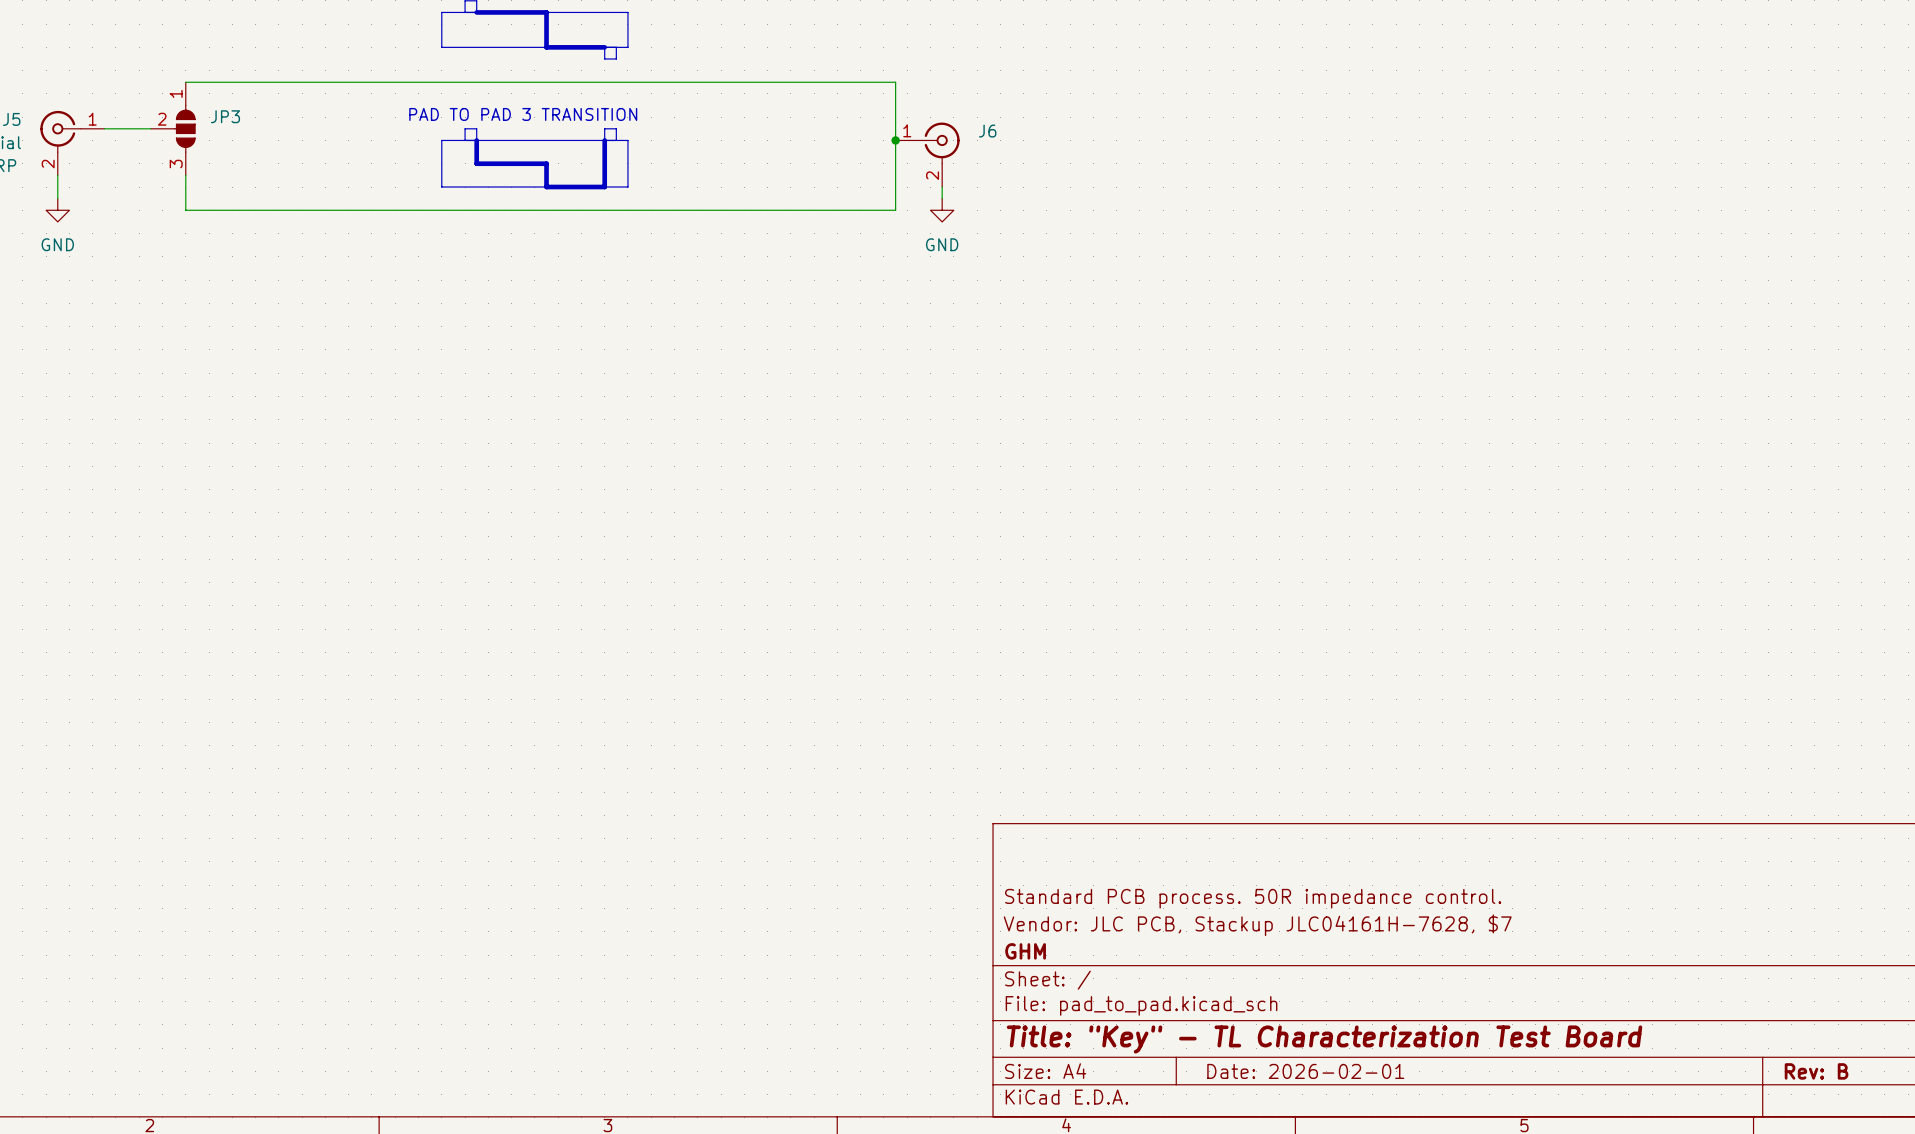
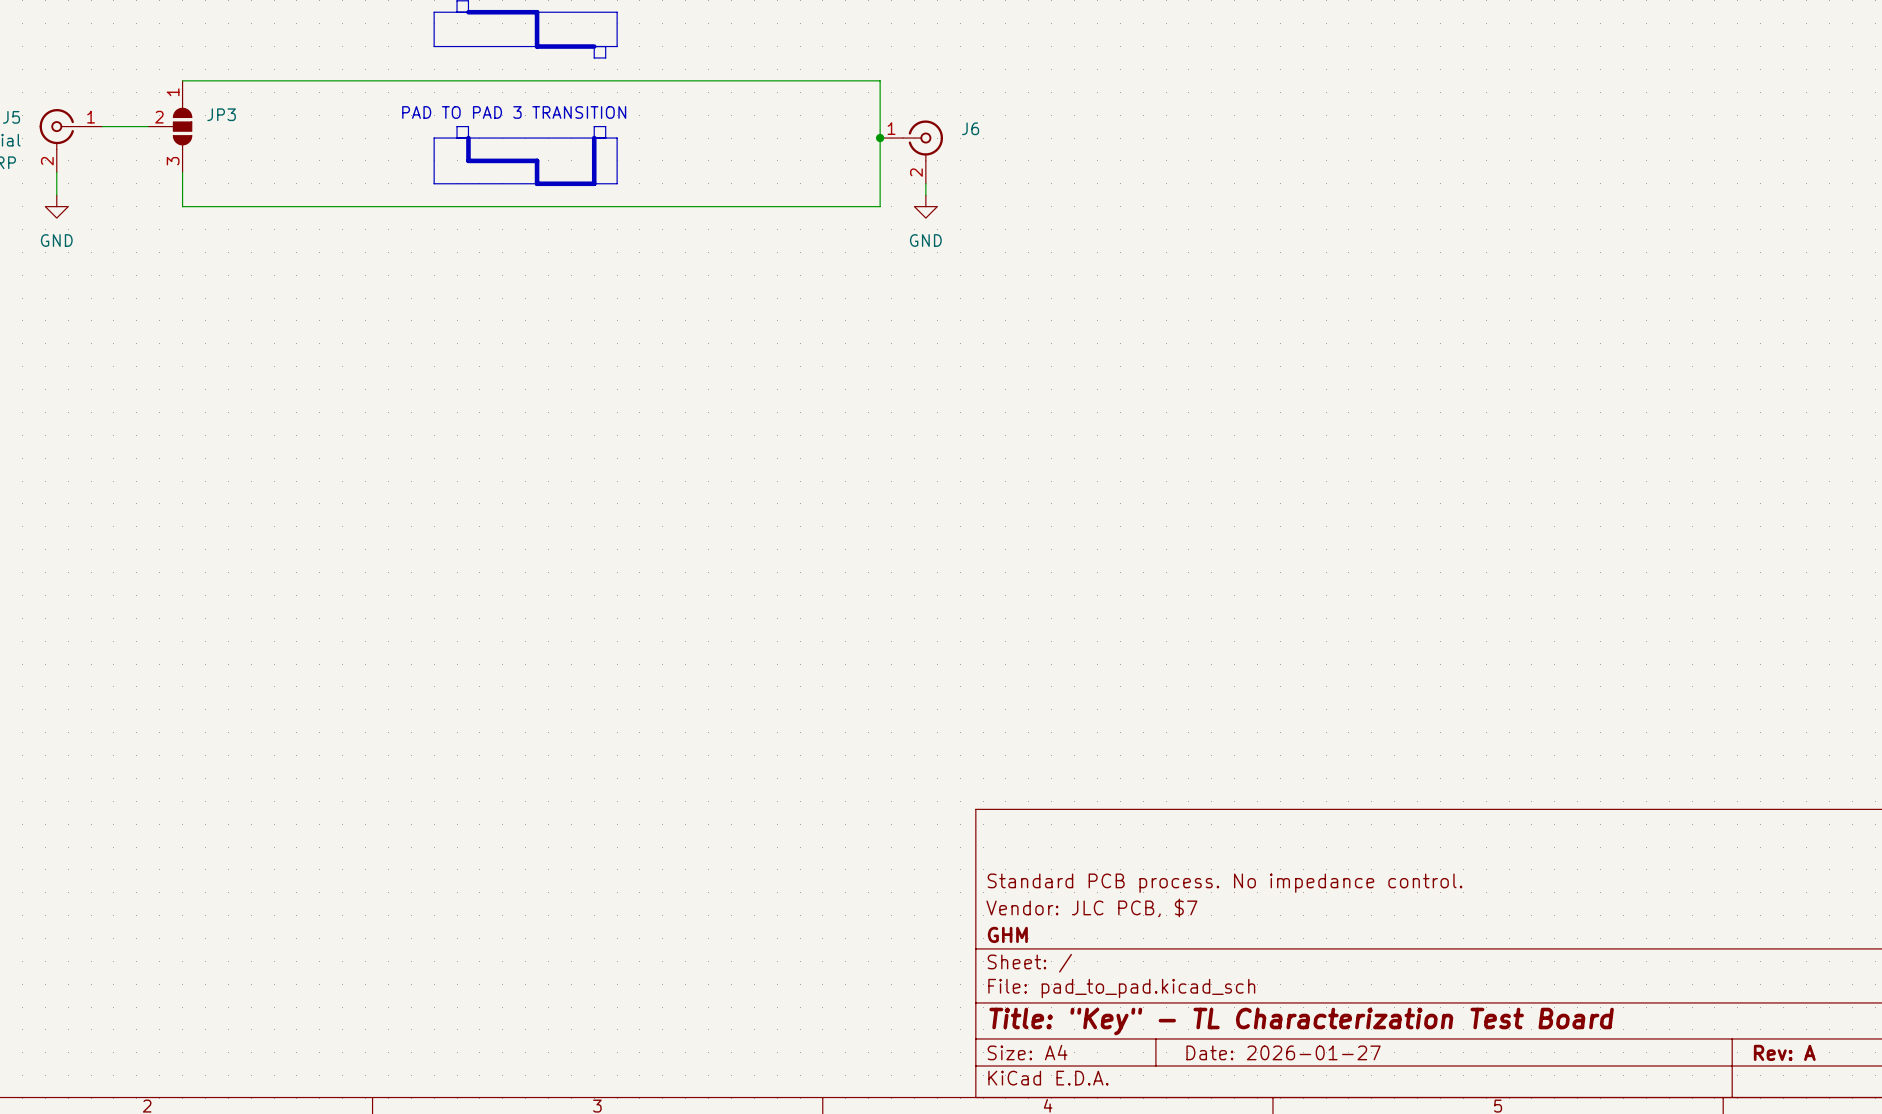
title block: Standard PCB process. 50R impedance control. (1253, 898) -> Standard PCB process. No impedance control. (1225, 883)
title block: Vendor: JLC PCB, Stackup JLC04161H-7628, $7 (1257, 925) -> Vendor: JLC PCB, $7 (1091, 907)
title block: Date: 2026-02-01 (1305, 1071) -> Date: 2026-01-27 (1283, 1052)
title block: Rev: B (1816, 1071) -> Rev: A (1784, 1052)

